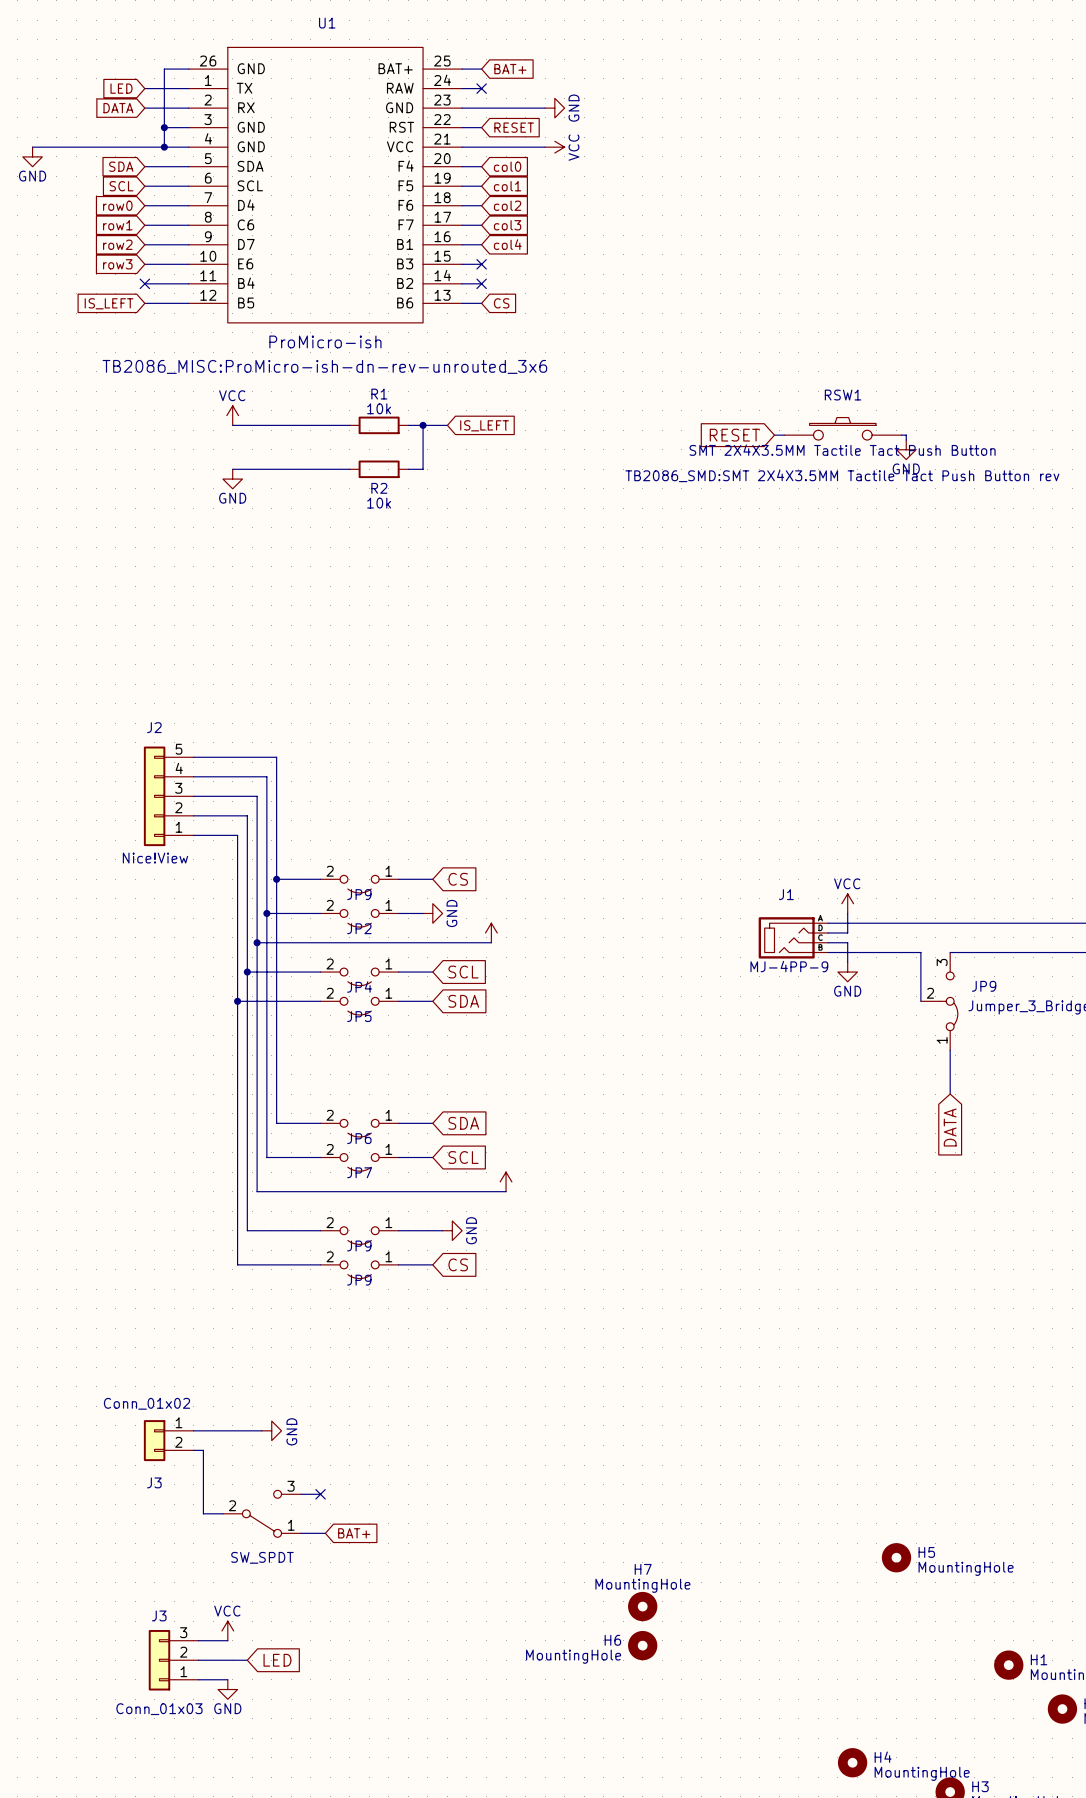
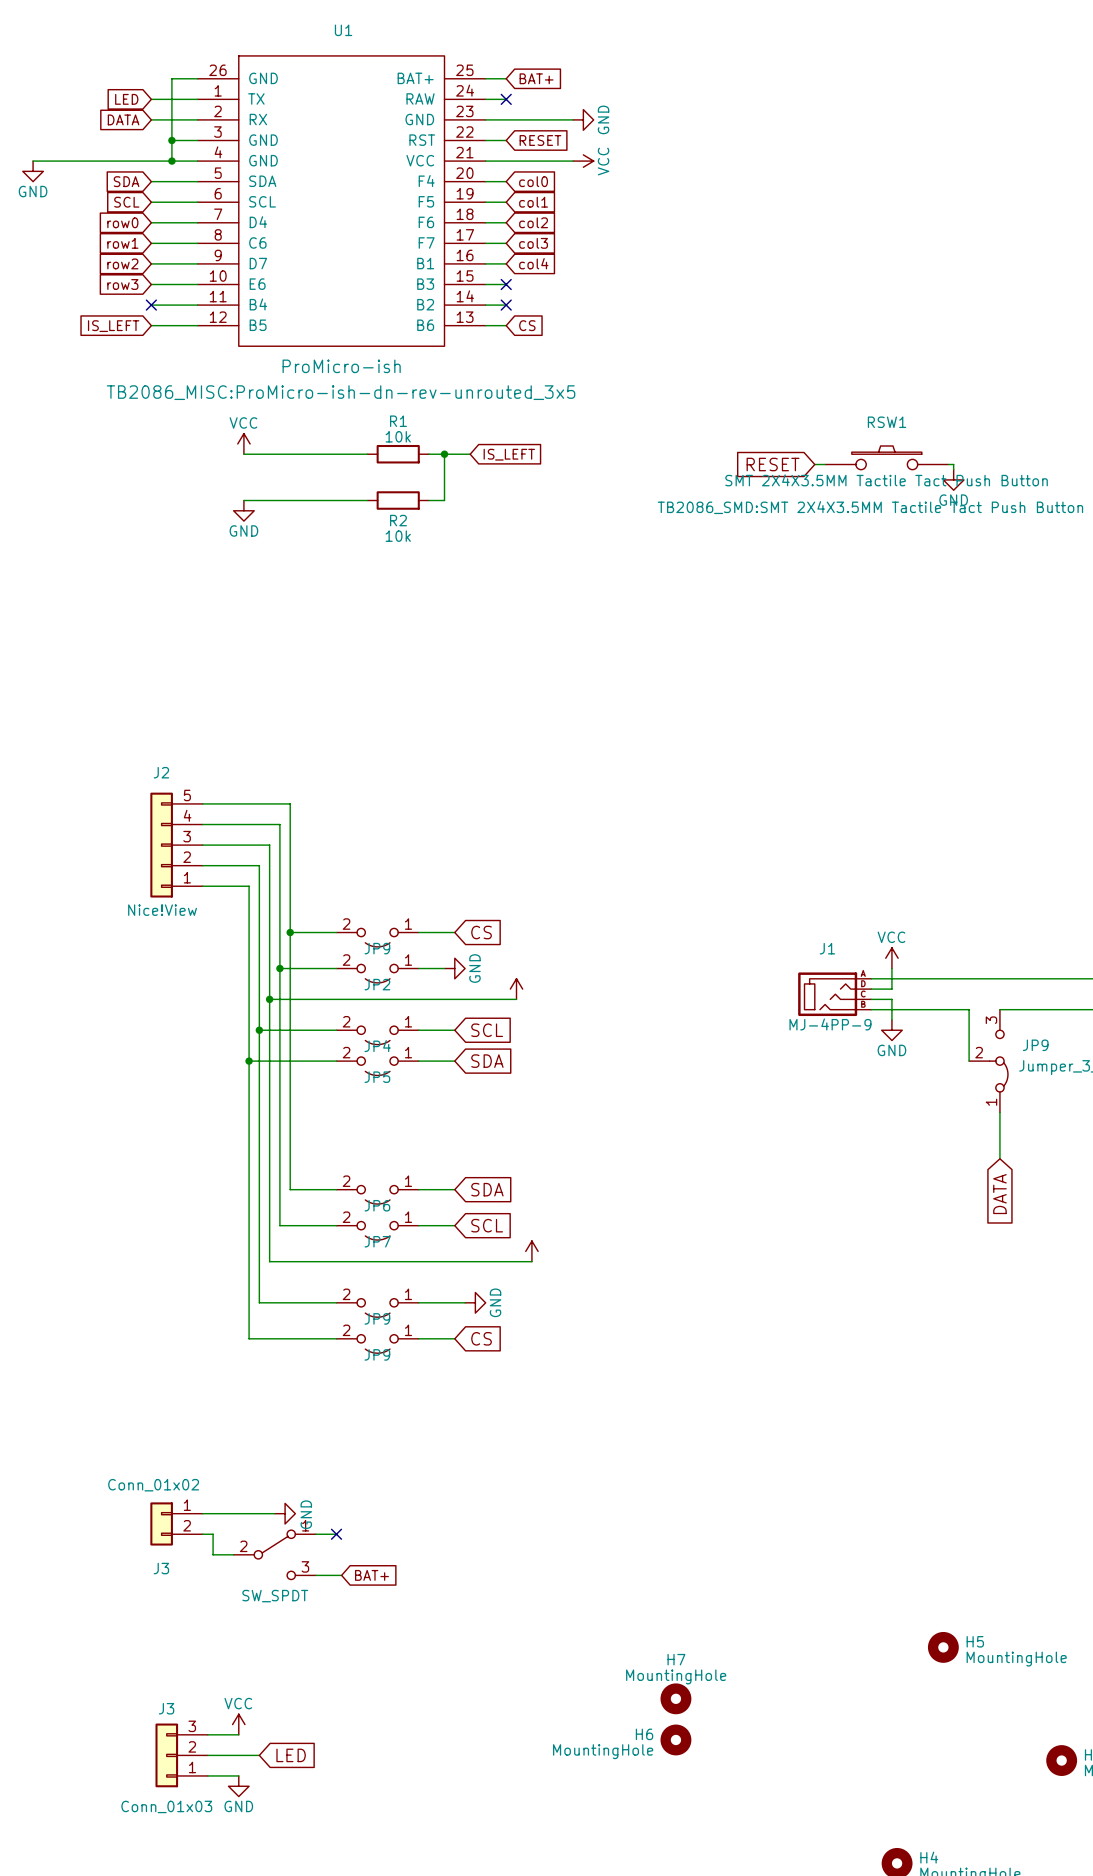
U1 text: TB2086_MISC:ProMicro-ish-dn-rev-unrouted_3x6 (324, 366) -> TB2086_MISC:ProMicro-ish-dn-rev-unrouted_3x5 (341, 392)
wire: (203, 1469) (203, 1513) (222, 1513) -> (213, 1554) (233, 1554)
part: none -> SW_SPDT (274, 1554)
wire: (301, 1494) (320, 1494) -> (315, 1534) (336, 1534)
no-connect mark position: (320, 1494) -> (336, 1534)
part: SW_SPDT (261, 1513) -> none
wire: (301, 1533) (325, 1533) -> (315, 1575) (341, 1575)
global label position: BAT+ (354, 1533) -> BAT+ (371, 1575)

